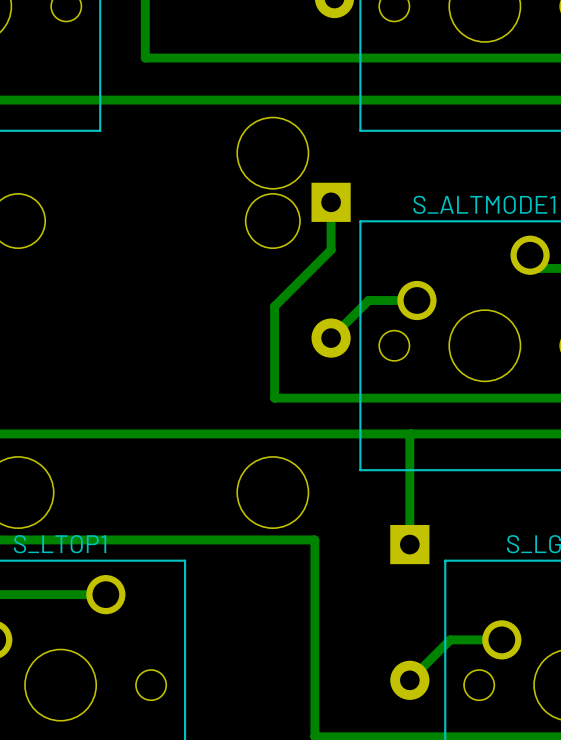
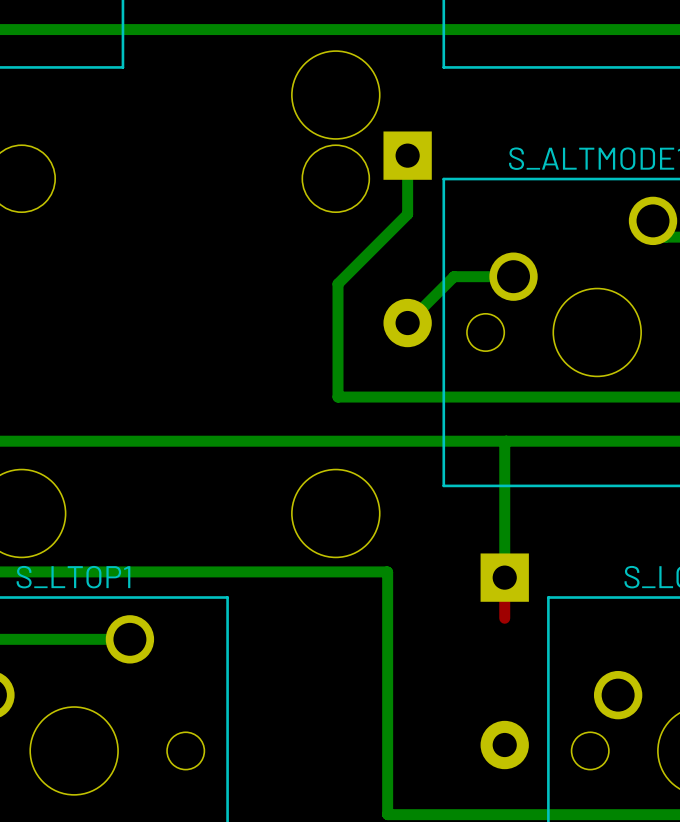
top track: none -> (504, 577) (504, 618)
bottom track: (501, 639) (450, 639) (409, 680) -> none

